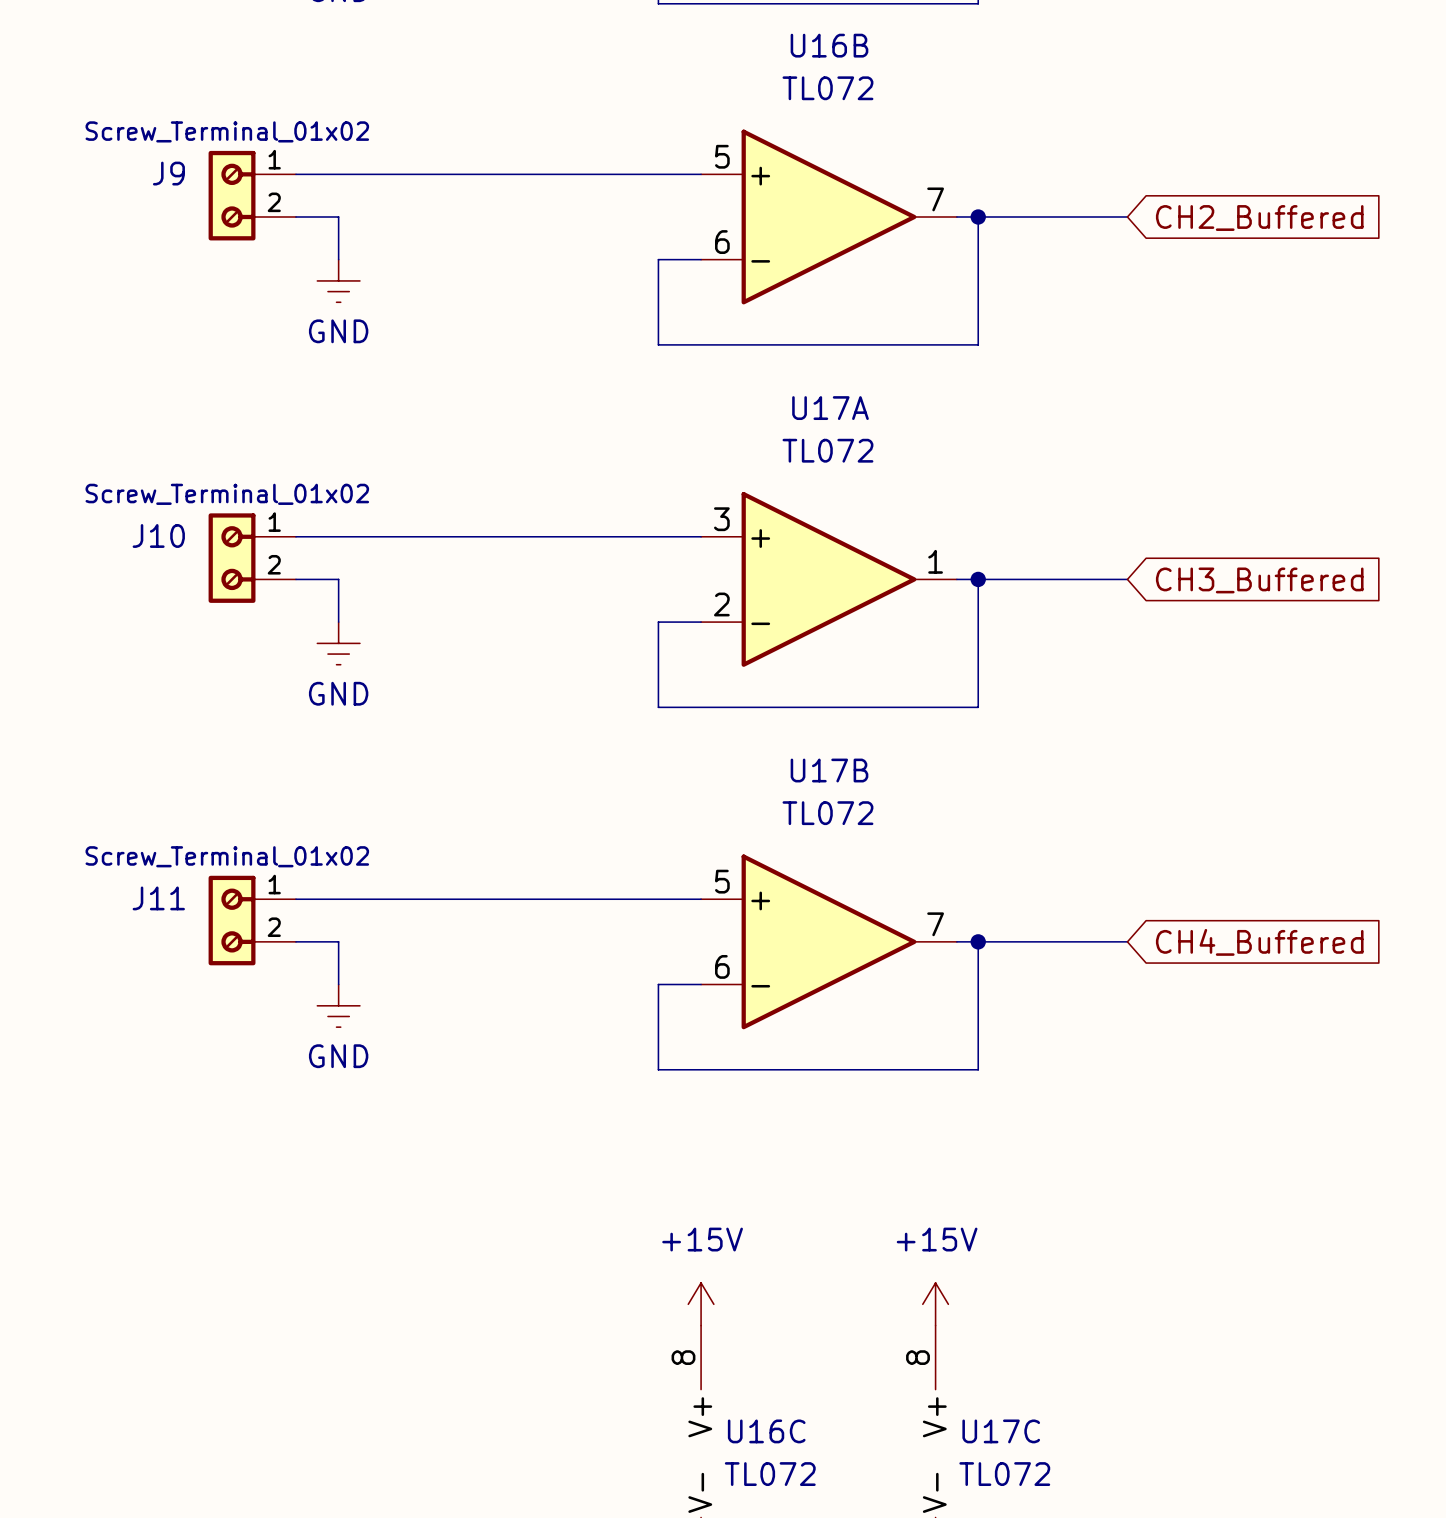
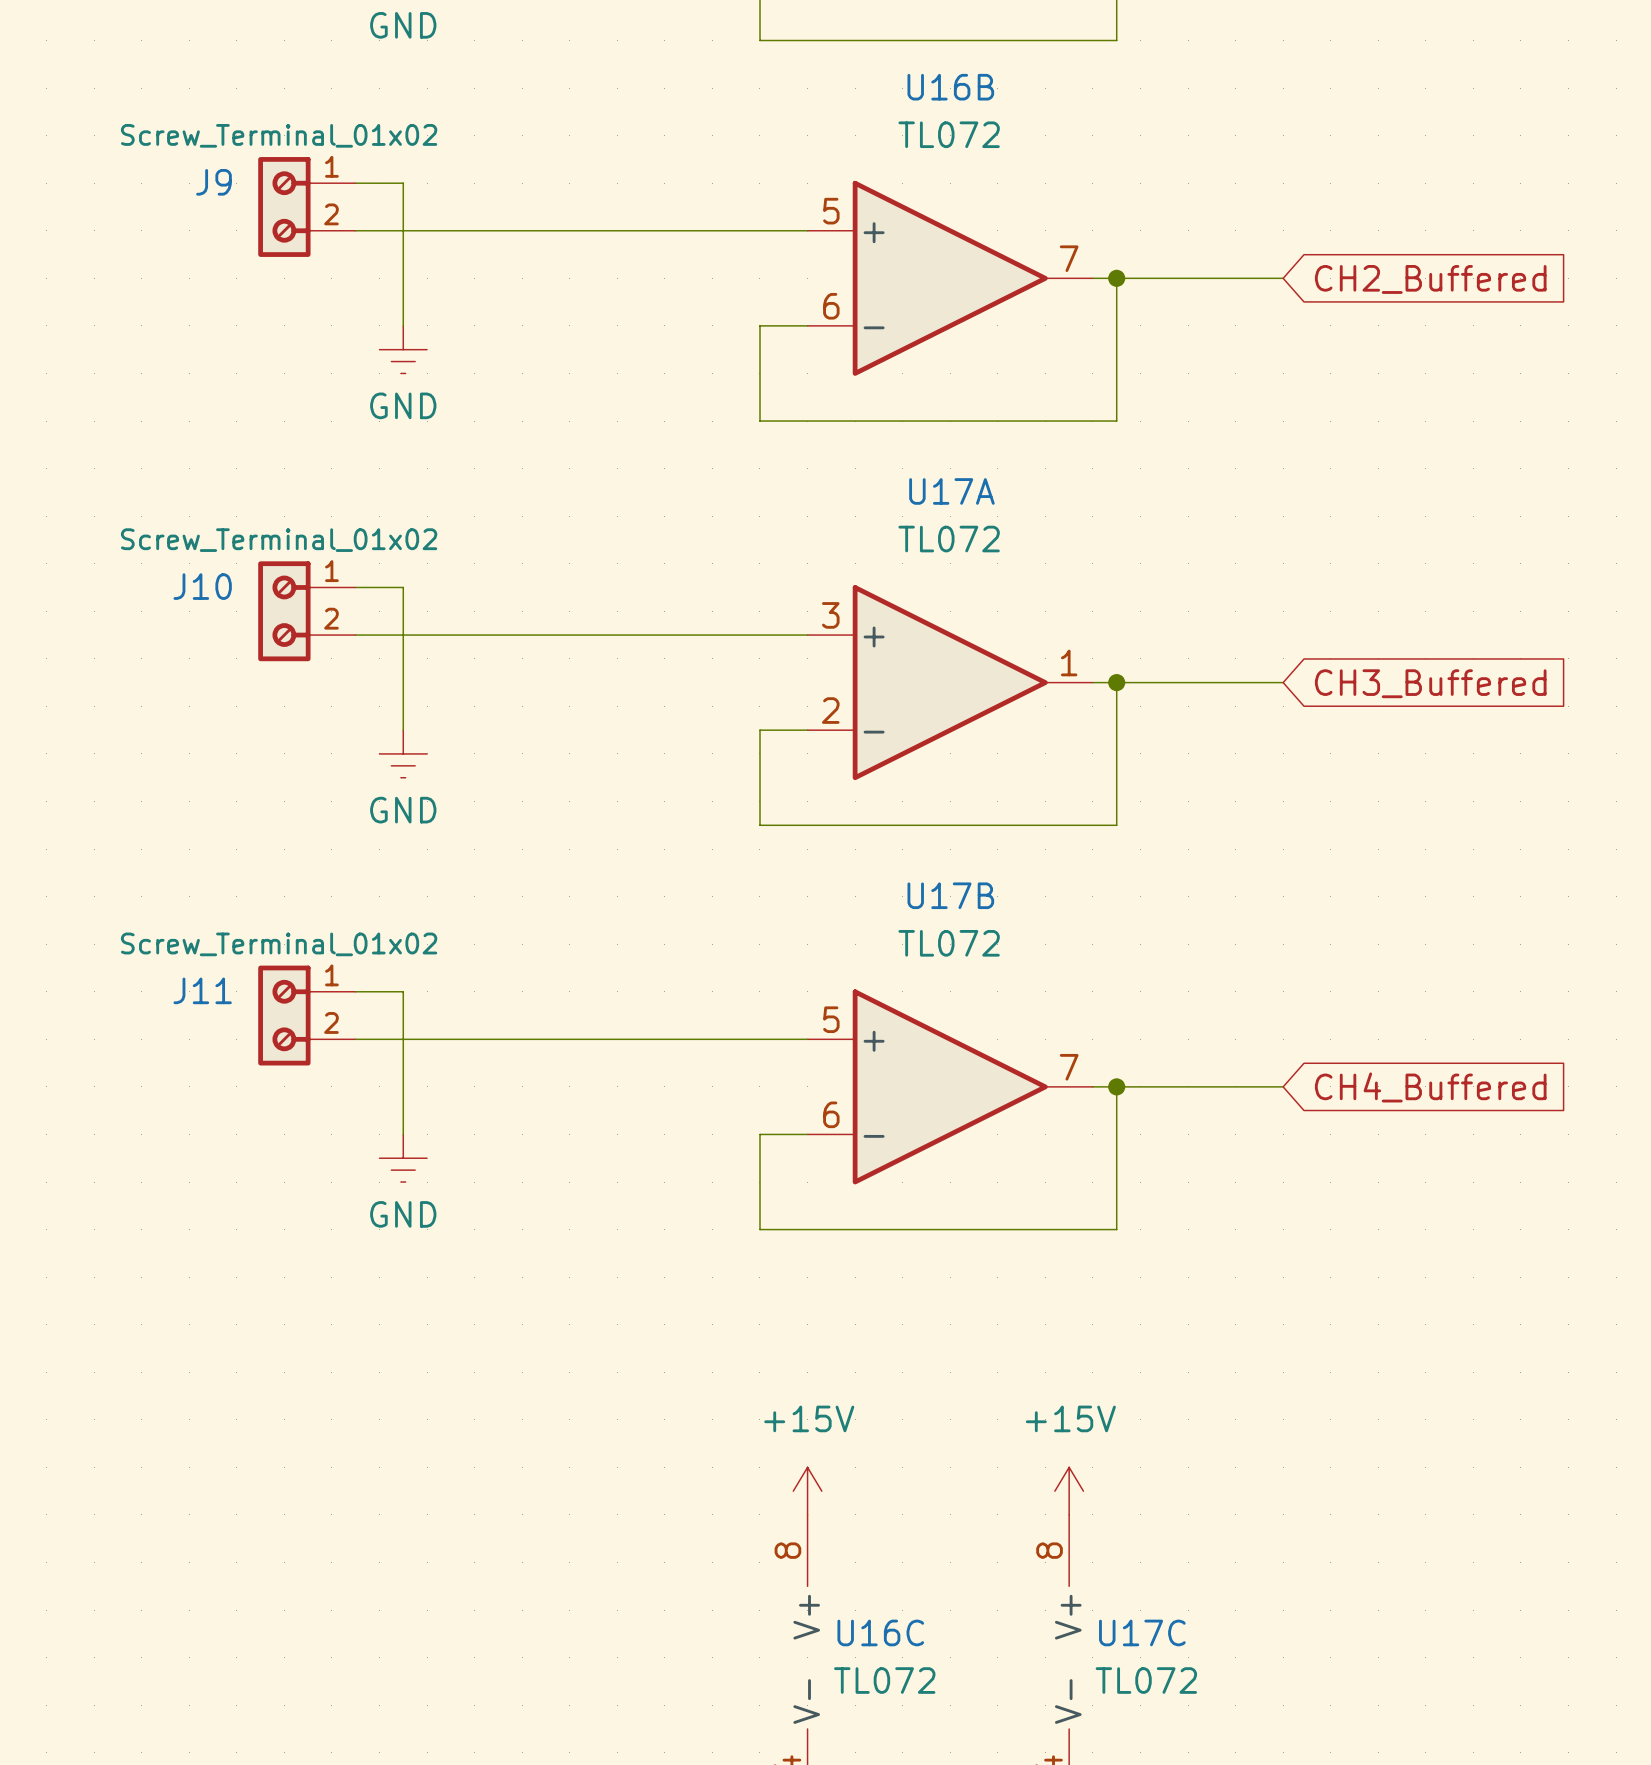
J9 position: (252, 195) -> (306, 206)
wire: (295, 217) (338, 217) -> (355, 183) (403, 183) (403, 278)
J10 position: (252, 558) -> (306, 611)
wire: (295, 579) (338, 579) -> (355, 587) (403, 587) (403, 682)
J11 position: (252, 920) -> (306, 1015)
wire: (295, 941) (338, 941) -> (355, 991) (403, 991) (403, 1086)

